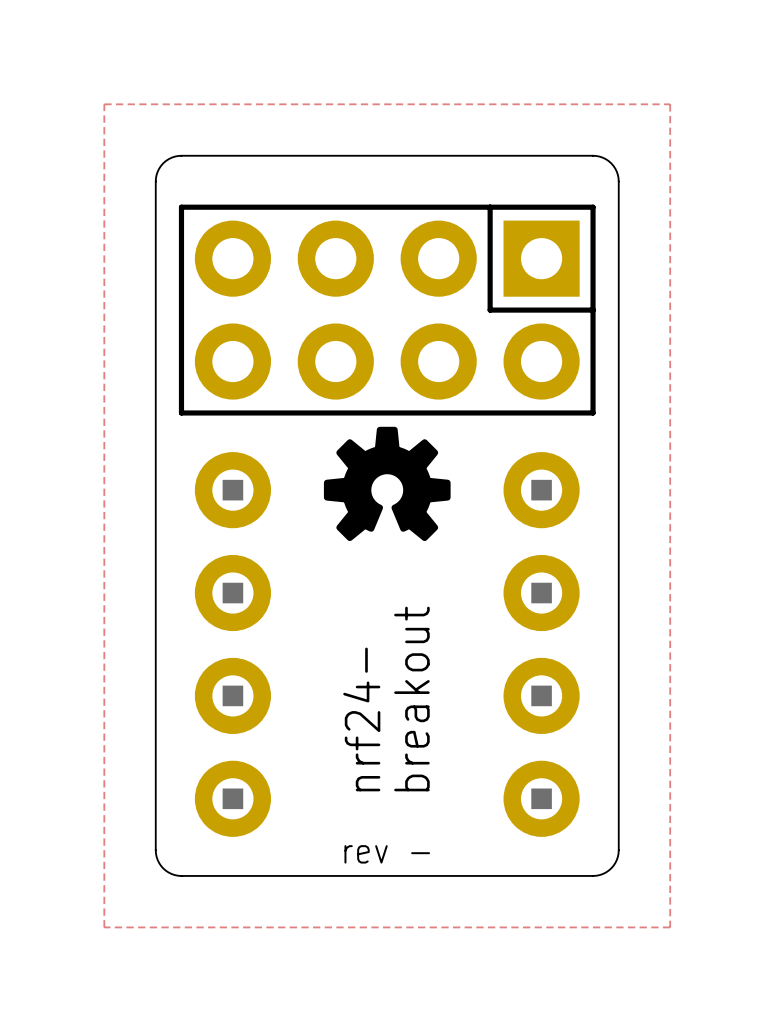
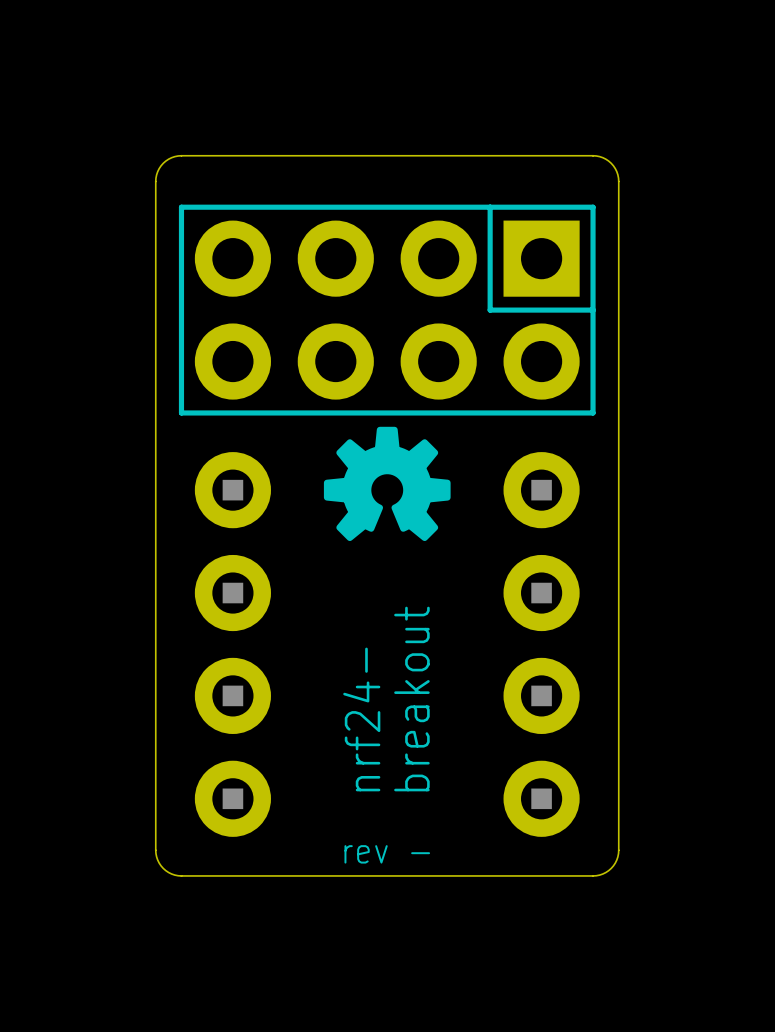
zone outline: (104, 104) (670, 104) (670, 927) (104, 927) (104, 104) -> none

